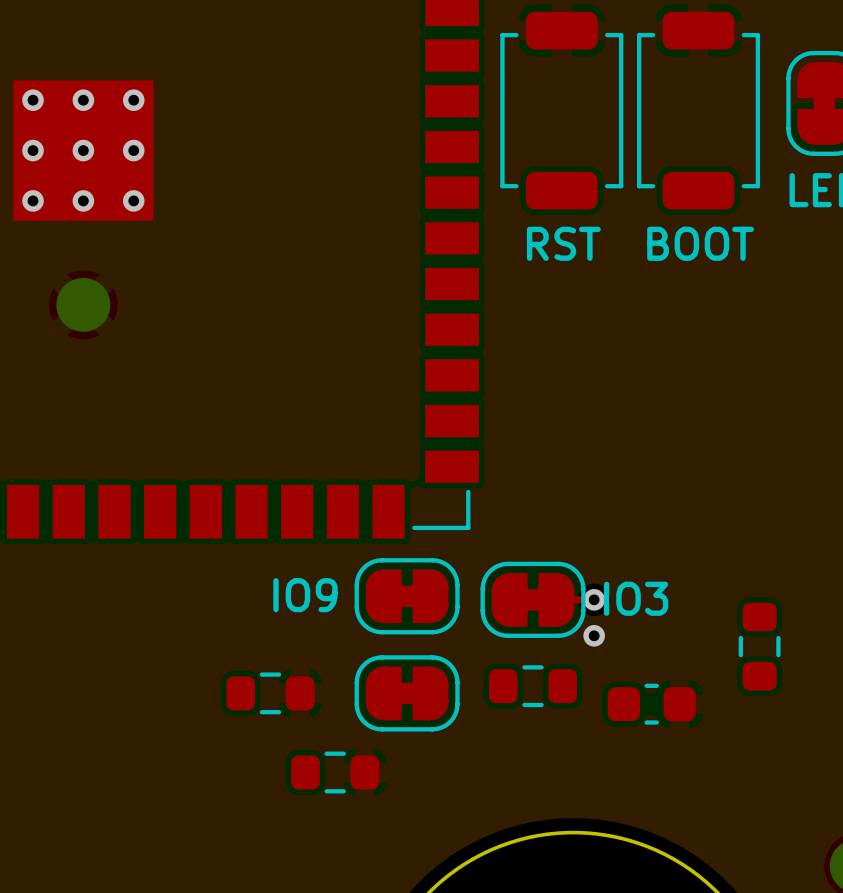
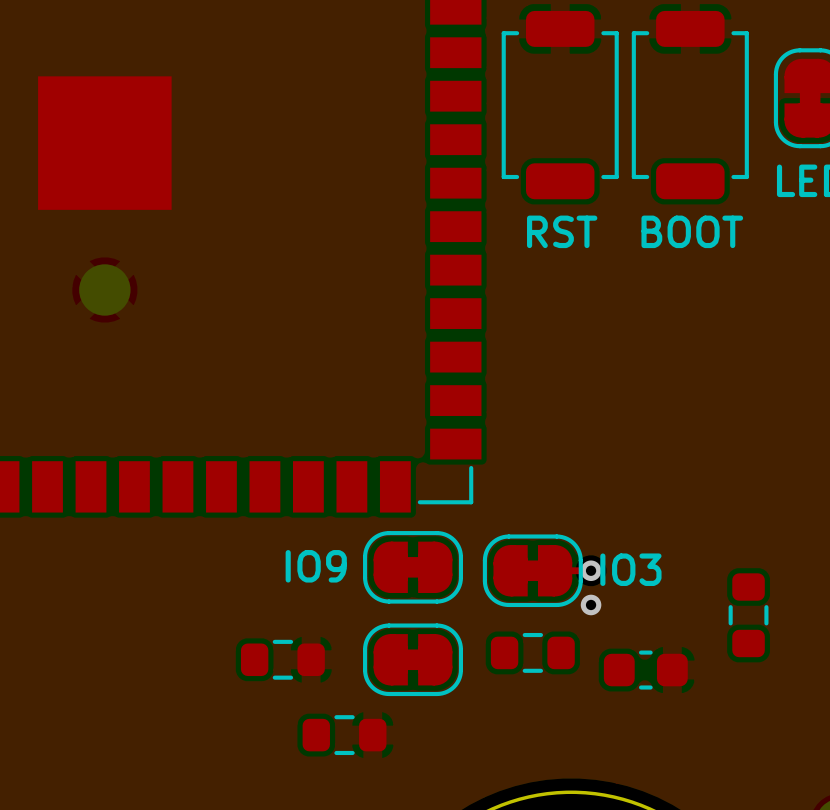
via: (33, 100) -> none
via: (83, 100) -> none
via: (133, 100) -> none
via: (33, 150) -> none
via: (83, 150) -> none
via: (133, 150) -> none
via: (33, 200) -> none
via: (83, 200) -> none
via: (133, 200) -> none

